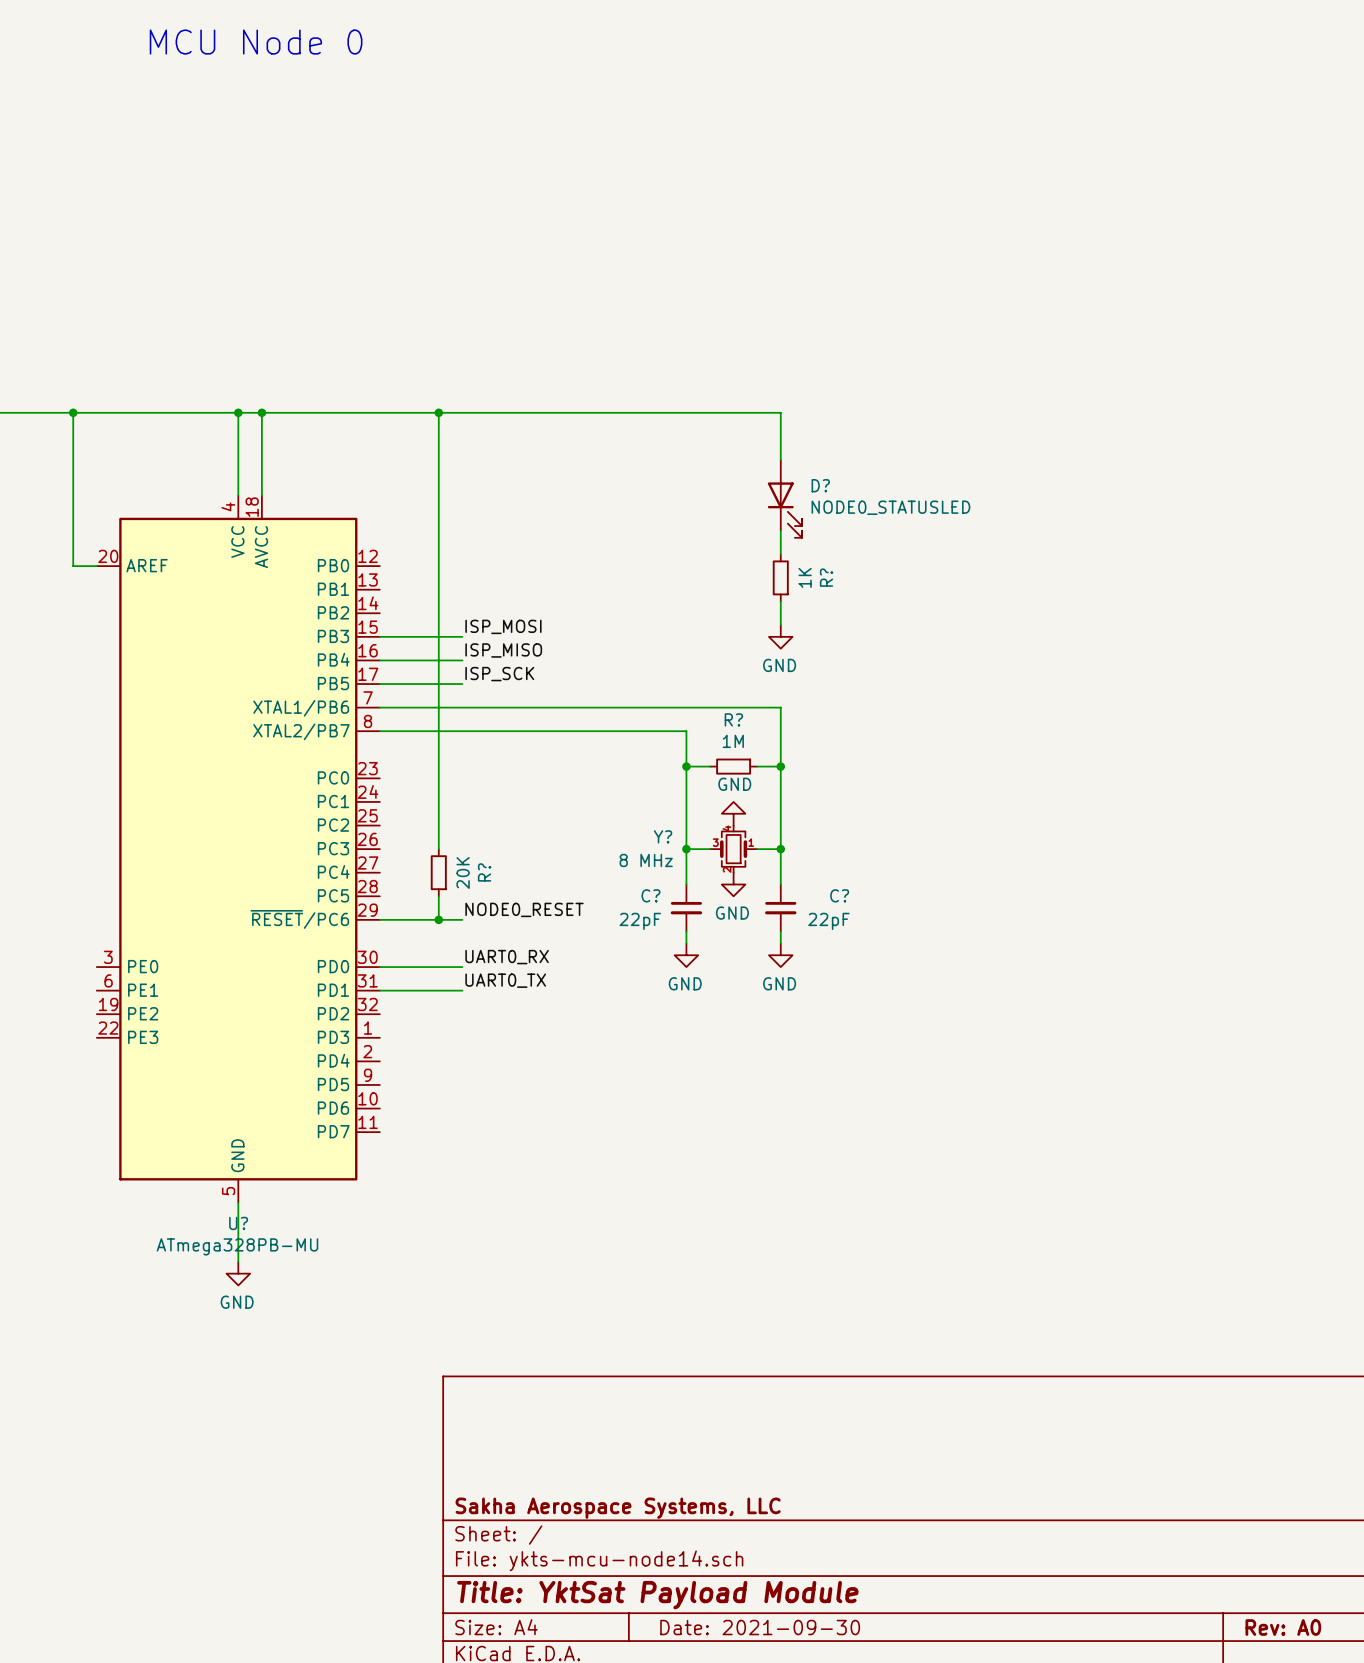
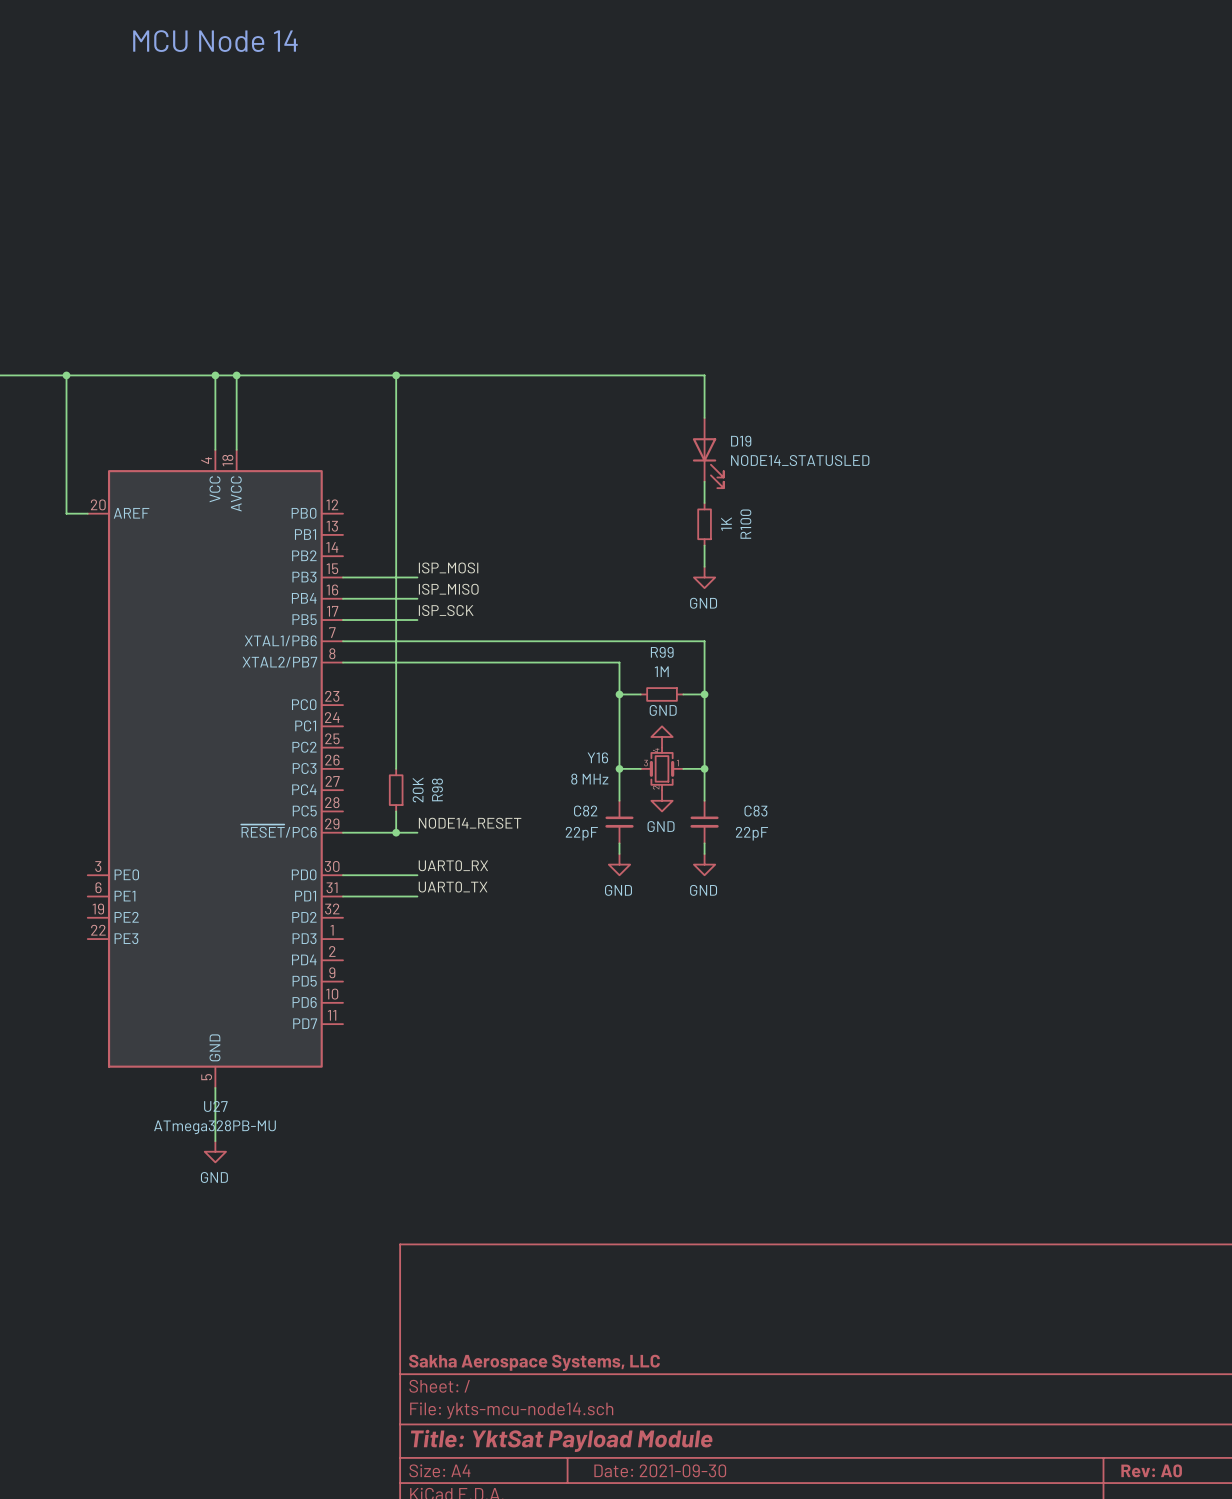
text: MCU Node 0 (256, 42) -> MCU Node 14 (215, 41)
D? name: D? (820, 485) -> D19 (741, 441)
D? value: NODE0_STATUSLED (890, 507) -> NODE14_STATUSLED (800, 460)
R? name: R? (826, 577) -> R100 (745, 524)
R? name: R? (733, 719) -> R99 (662, 652)
Y? name: Y? (663, 836) -> Y16 (597, 757)
R? name: R? (484, 872) -> R98 (437, 789)
C? name: C? (650, 895) -> C82 (585, 811)
C? name: C? (839, 895) -> C83 (755, 811)
label: NODE0_RESET (524, 909) -> NODE14_RESET (470, 823)
U? name: U? (238, 1223) -> U27 (215, 1106)

